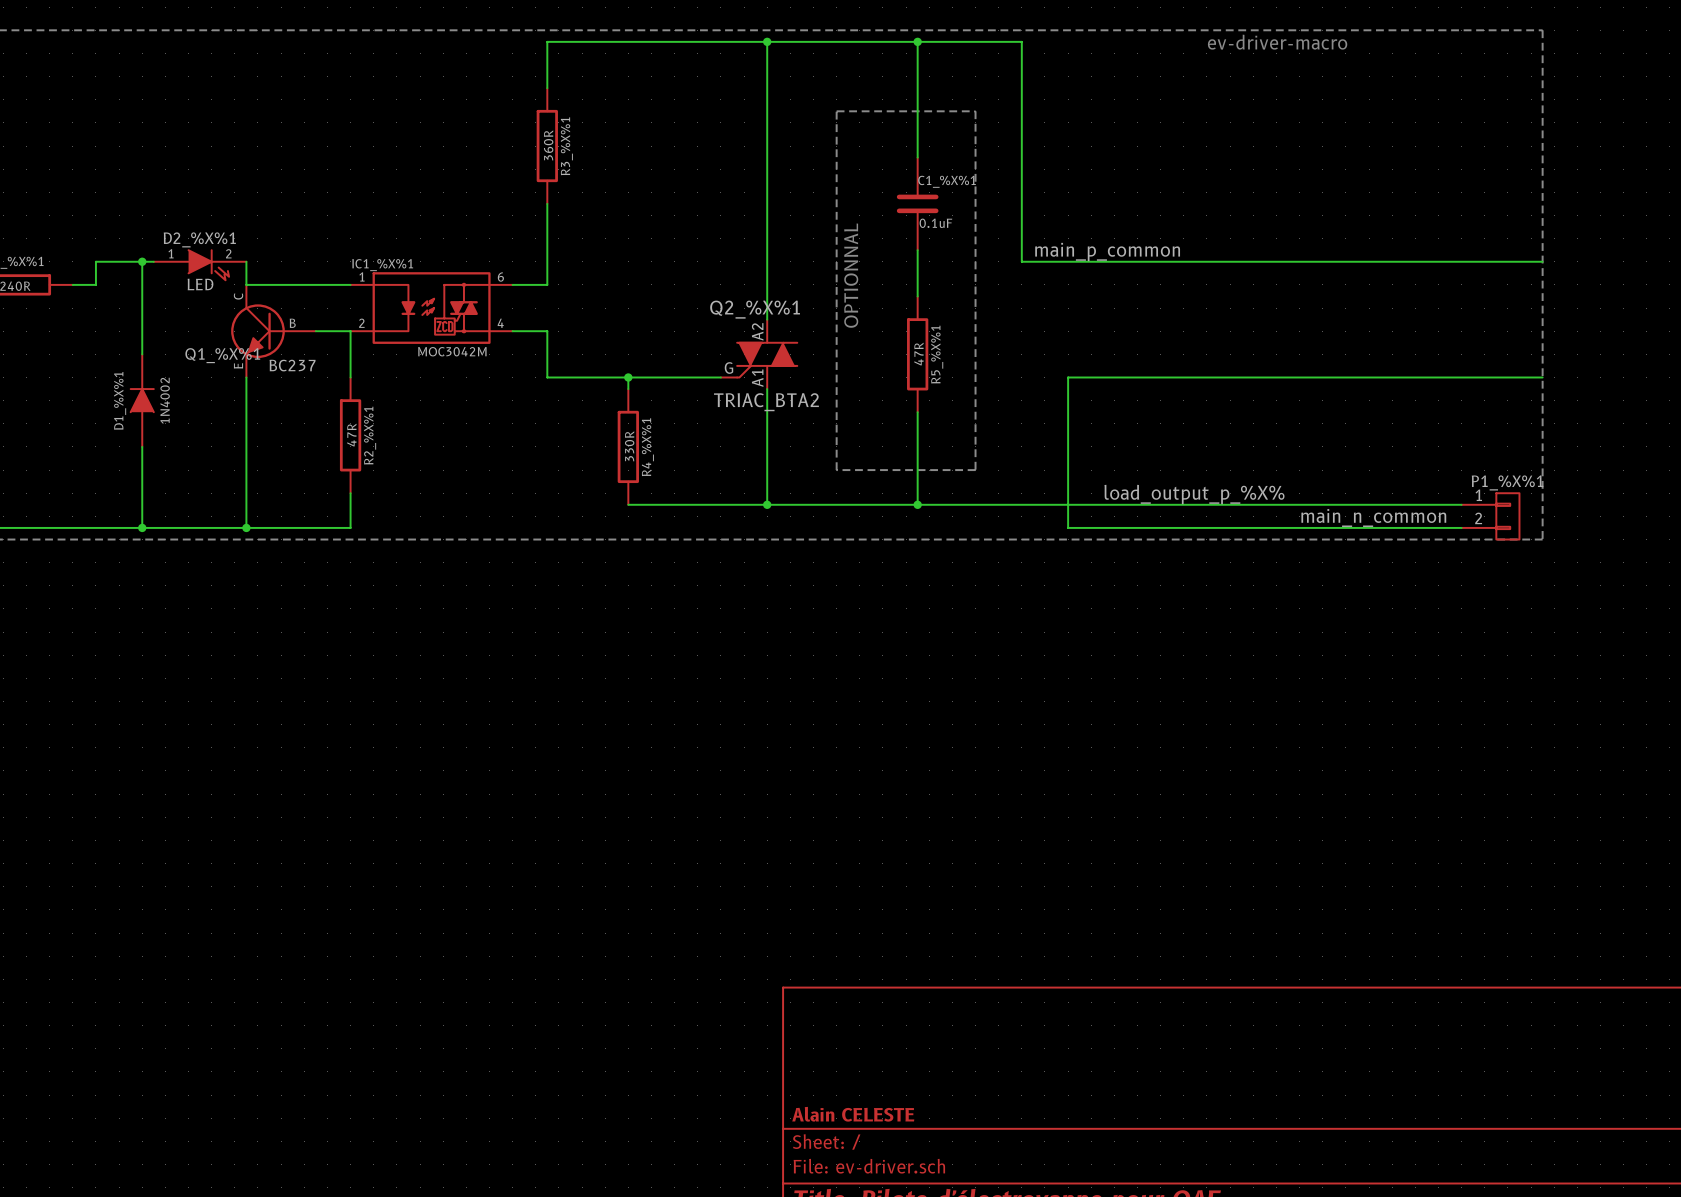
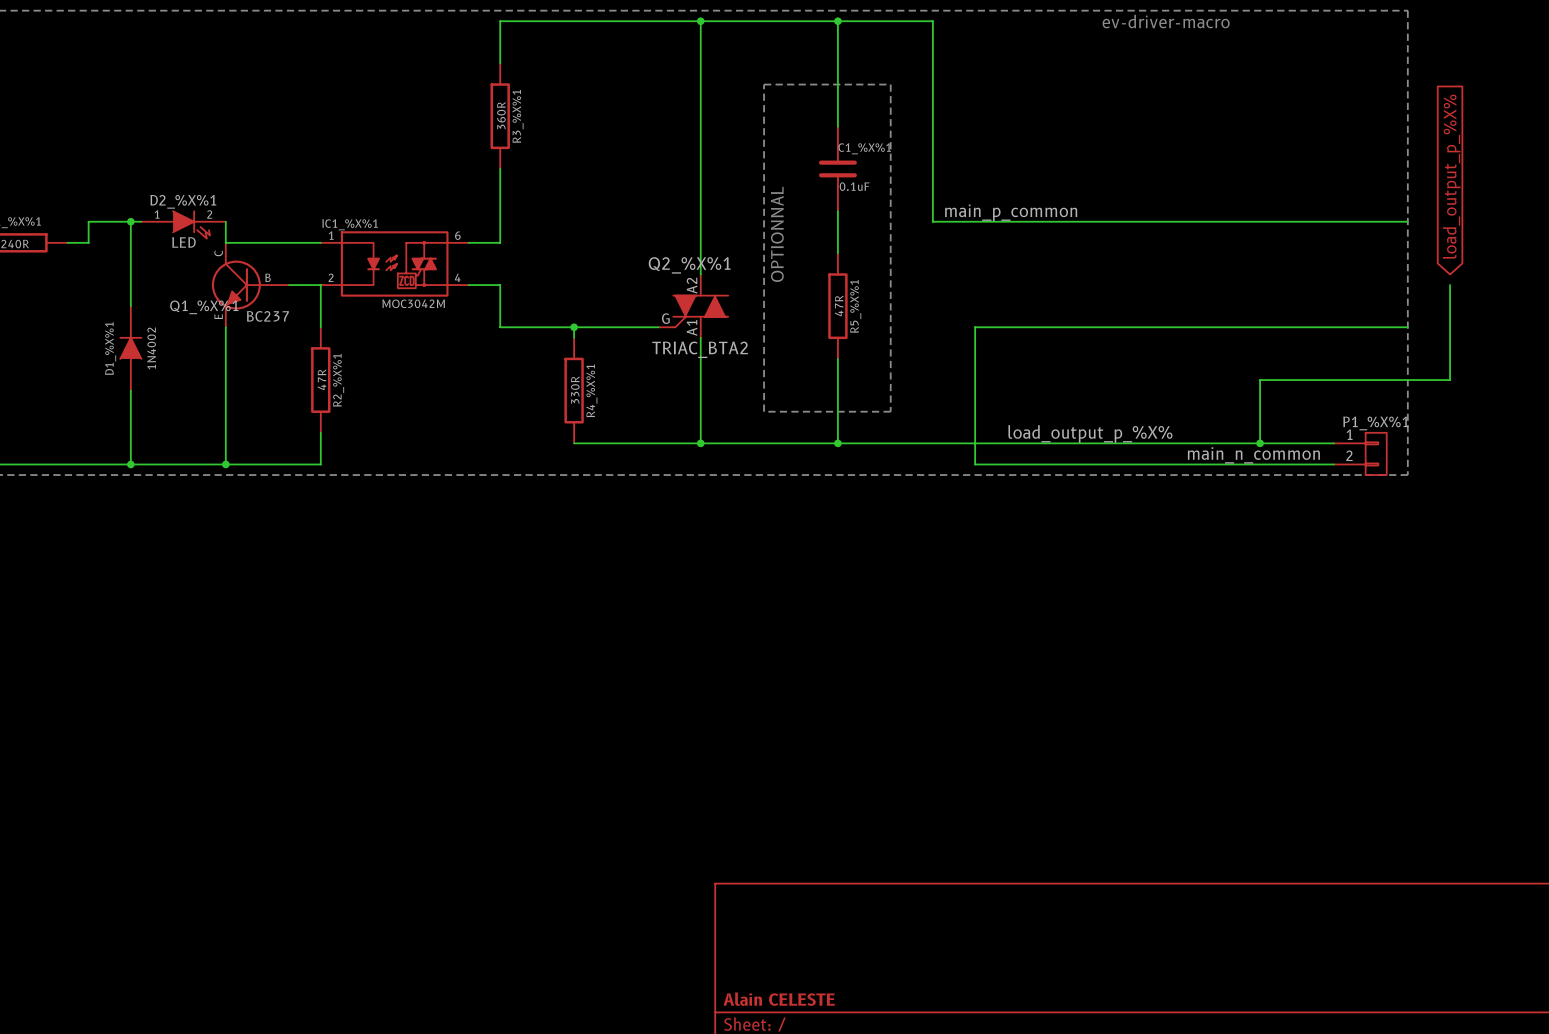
global label: none -> load_output_p_%X% (1451, 176)
wire: none -> (1450, 285) (1450, 380) (1260, 380) (1260, 443)
junction: none -> (1260, 443)

